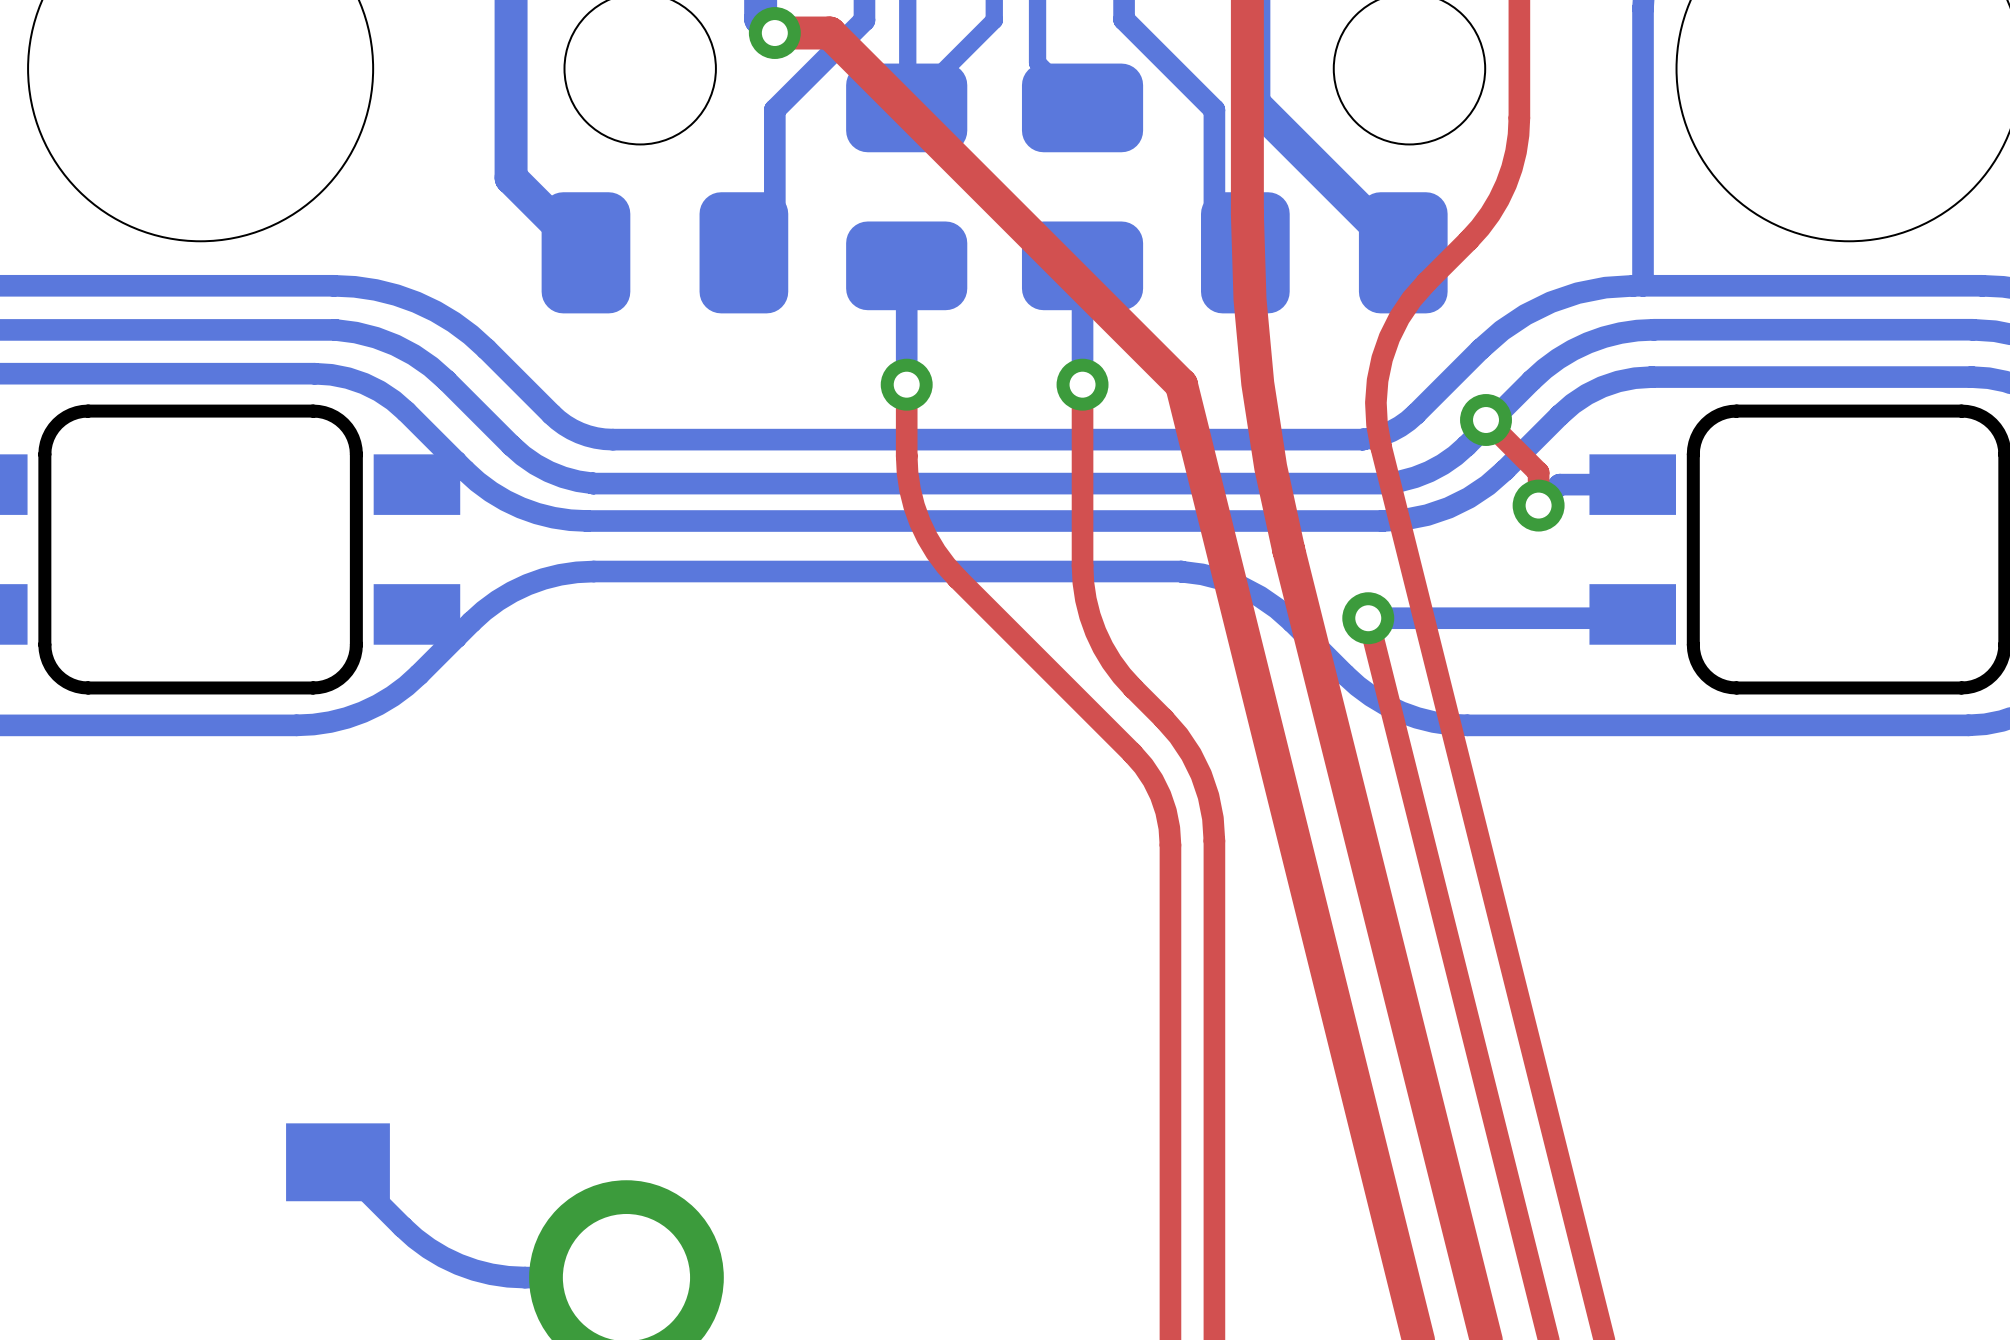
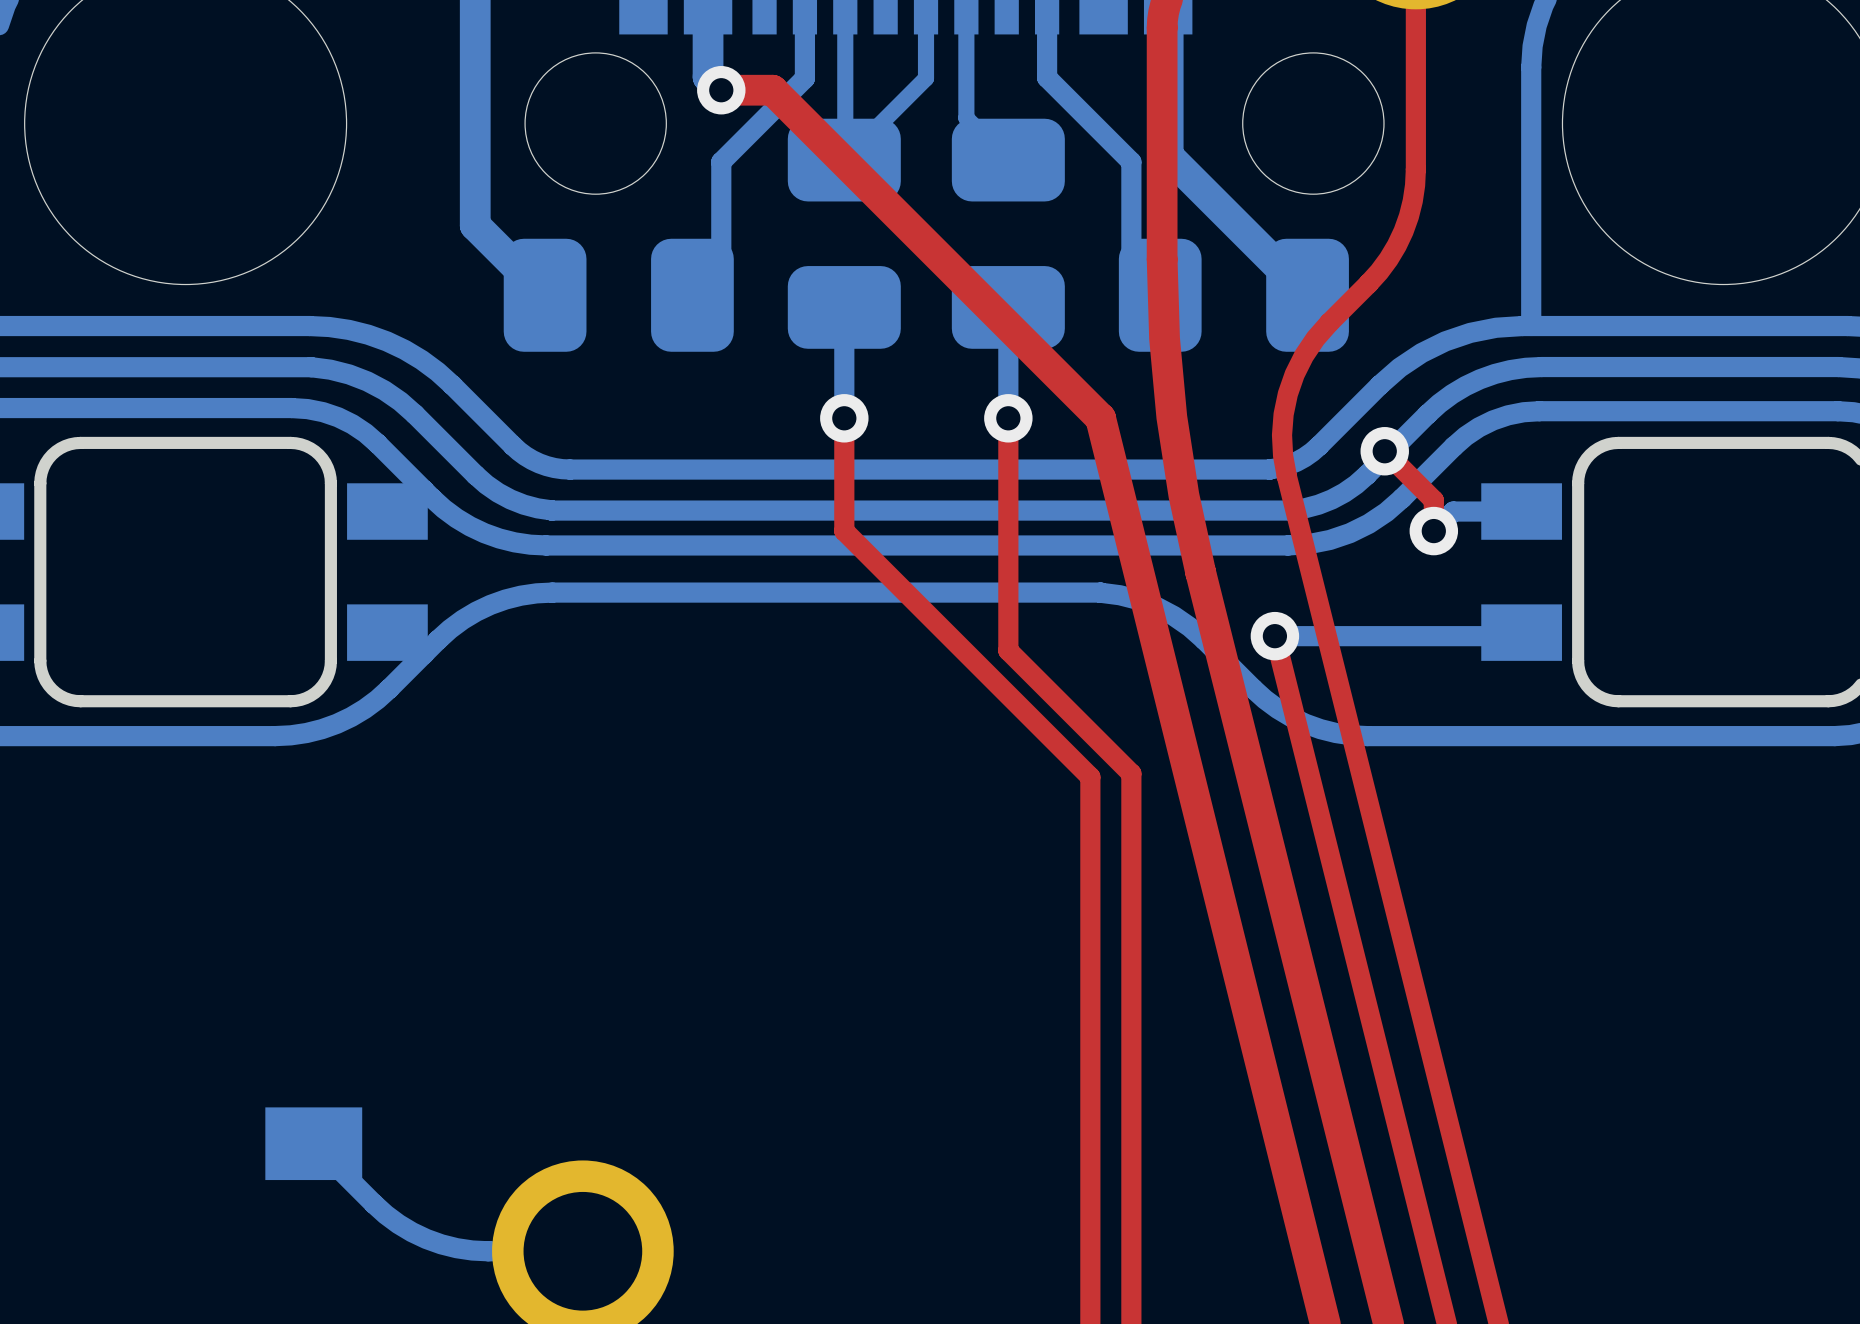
top track: (906, 455) (907, 472) (914, 506) (919, 522) (935, 552) (957, 578) (1143, 766) (1160, 795) (1166, 811) (1170, 845) -> (844, 484) (844, 531) (1090, 777) (1090, 847)
top track: (1082, 565) (1083, 582) (1089, 616) (1102, 647) (1121, 675) (1163, 718) (1191, 754) (1208, 796) (1214, 841) -> (1008, 587) (1008, 650) (1131, 773) (1131, 843)

